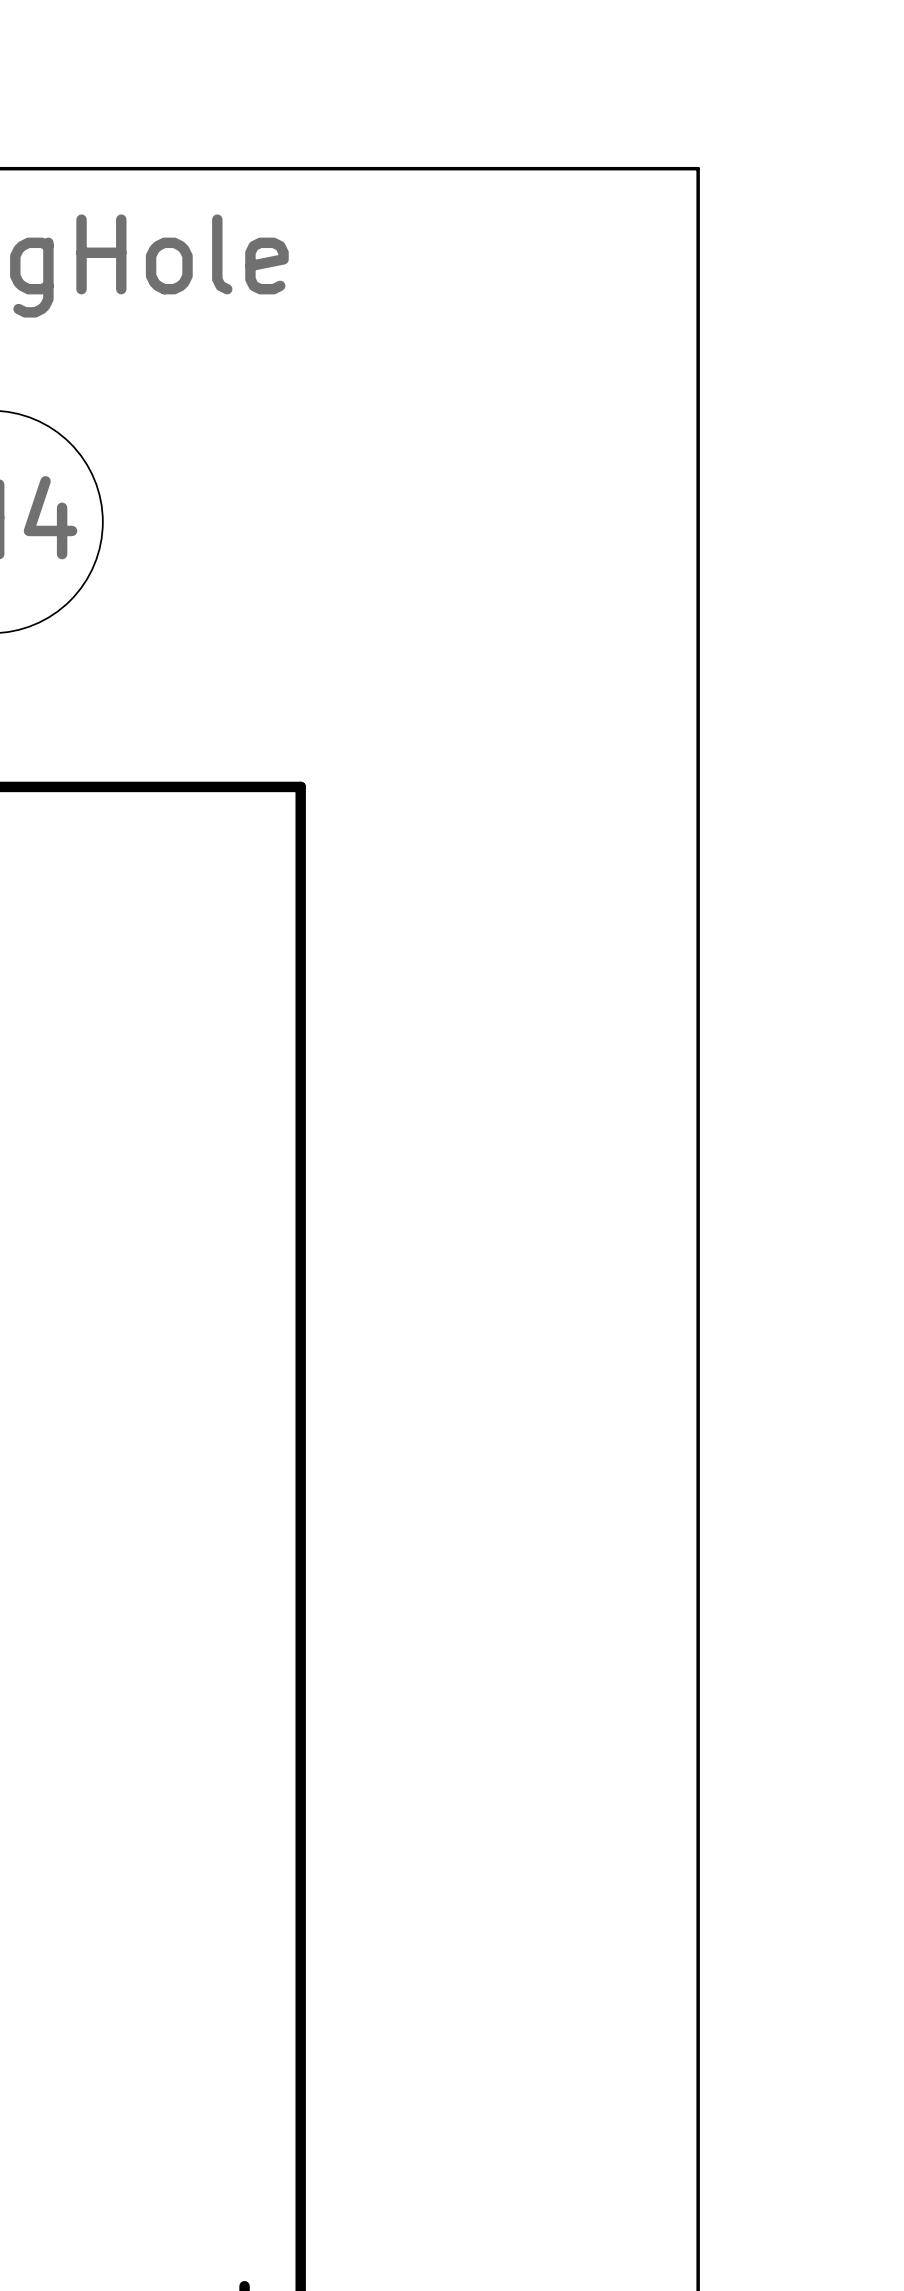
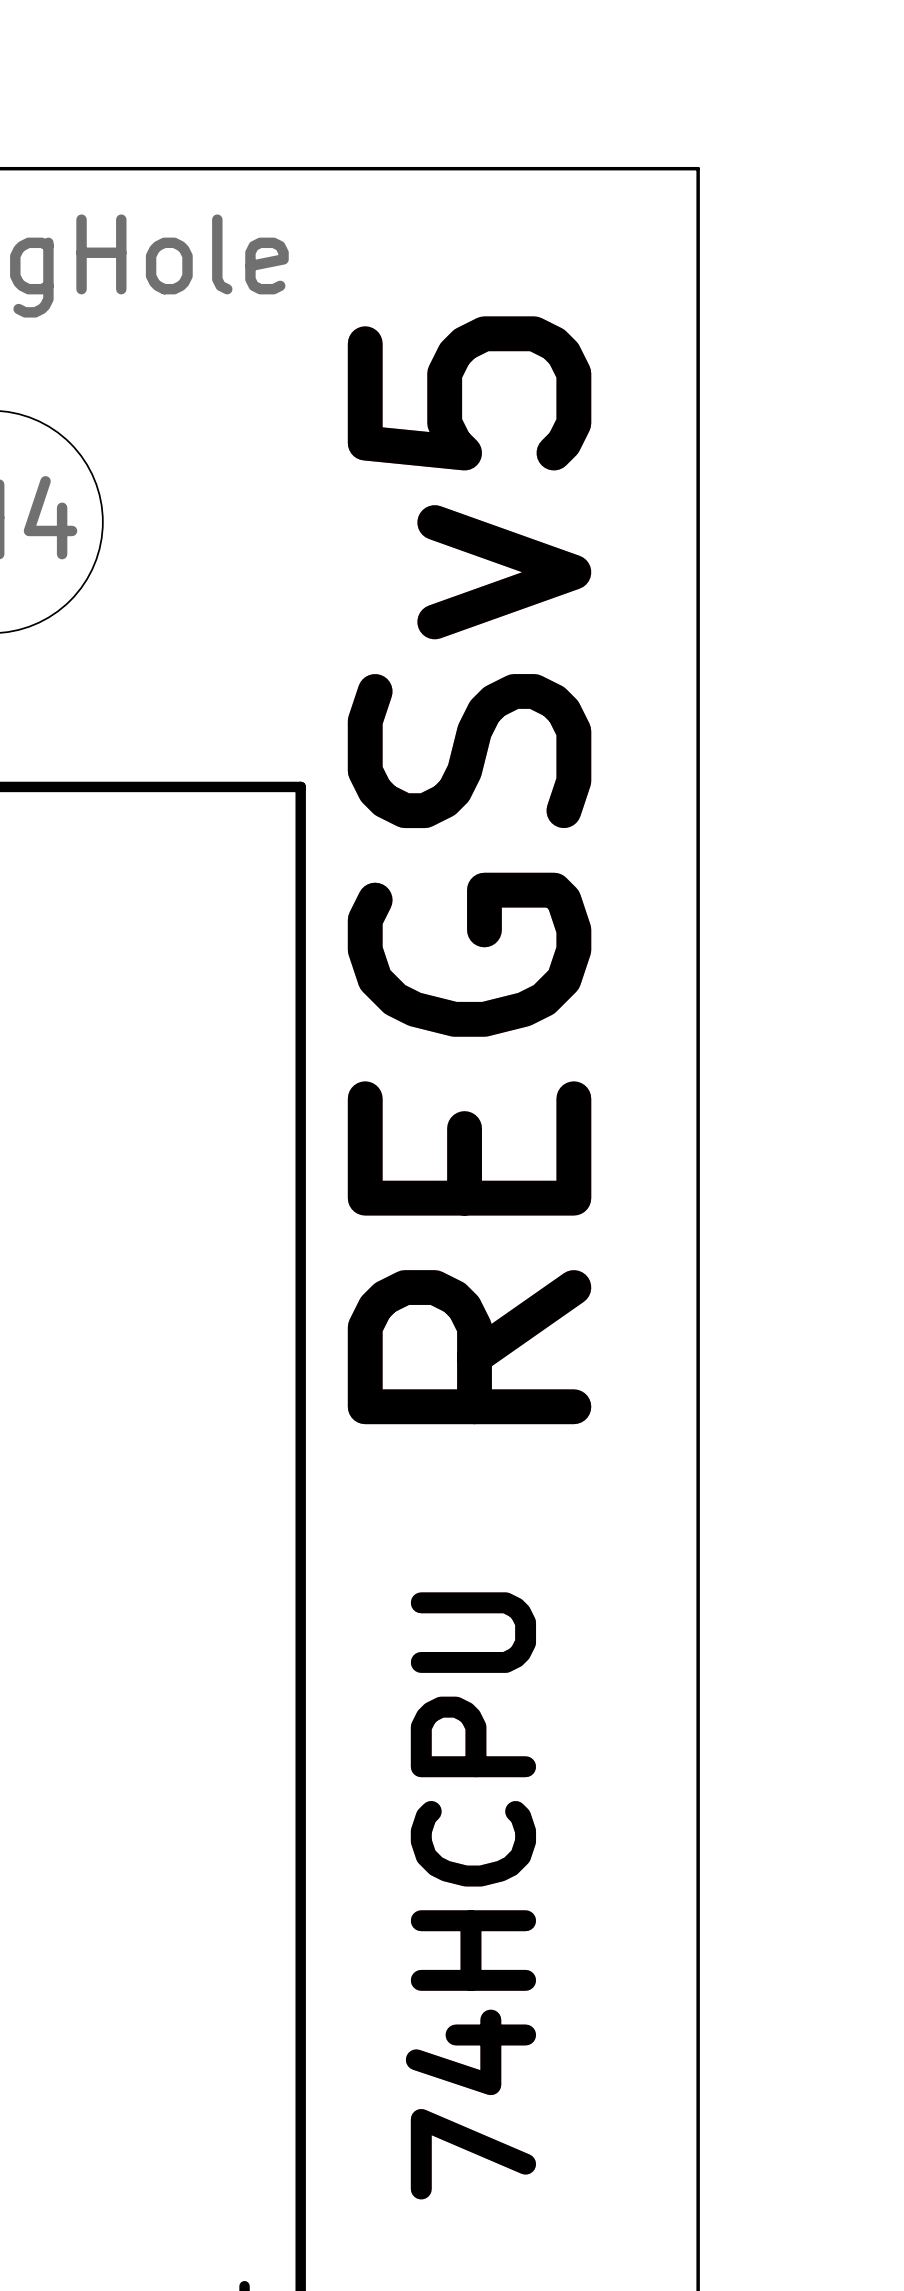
text: none -> REGSv5 (469, 870)
text: none -> 74HCPU (470, 1895)

